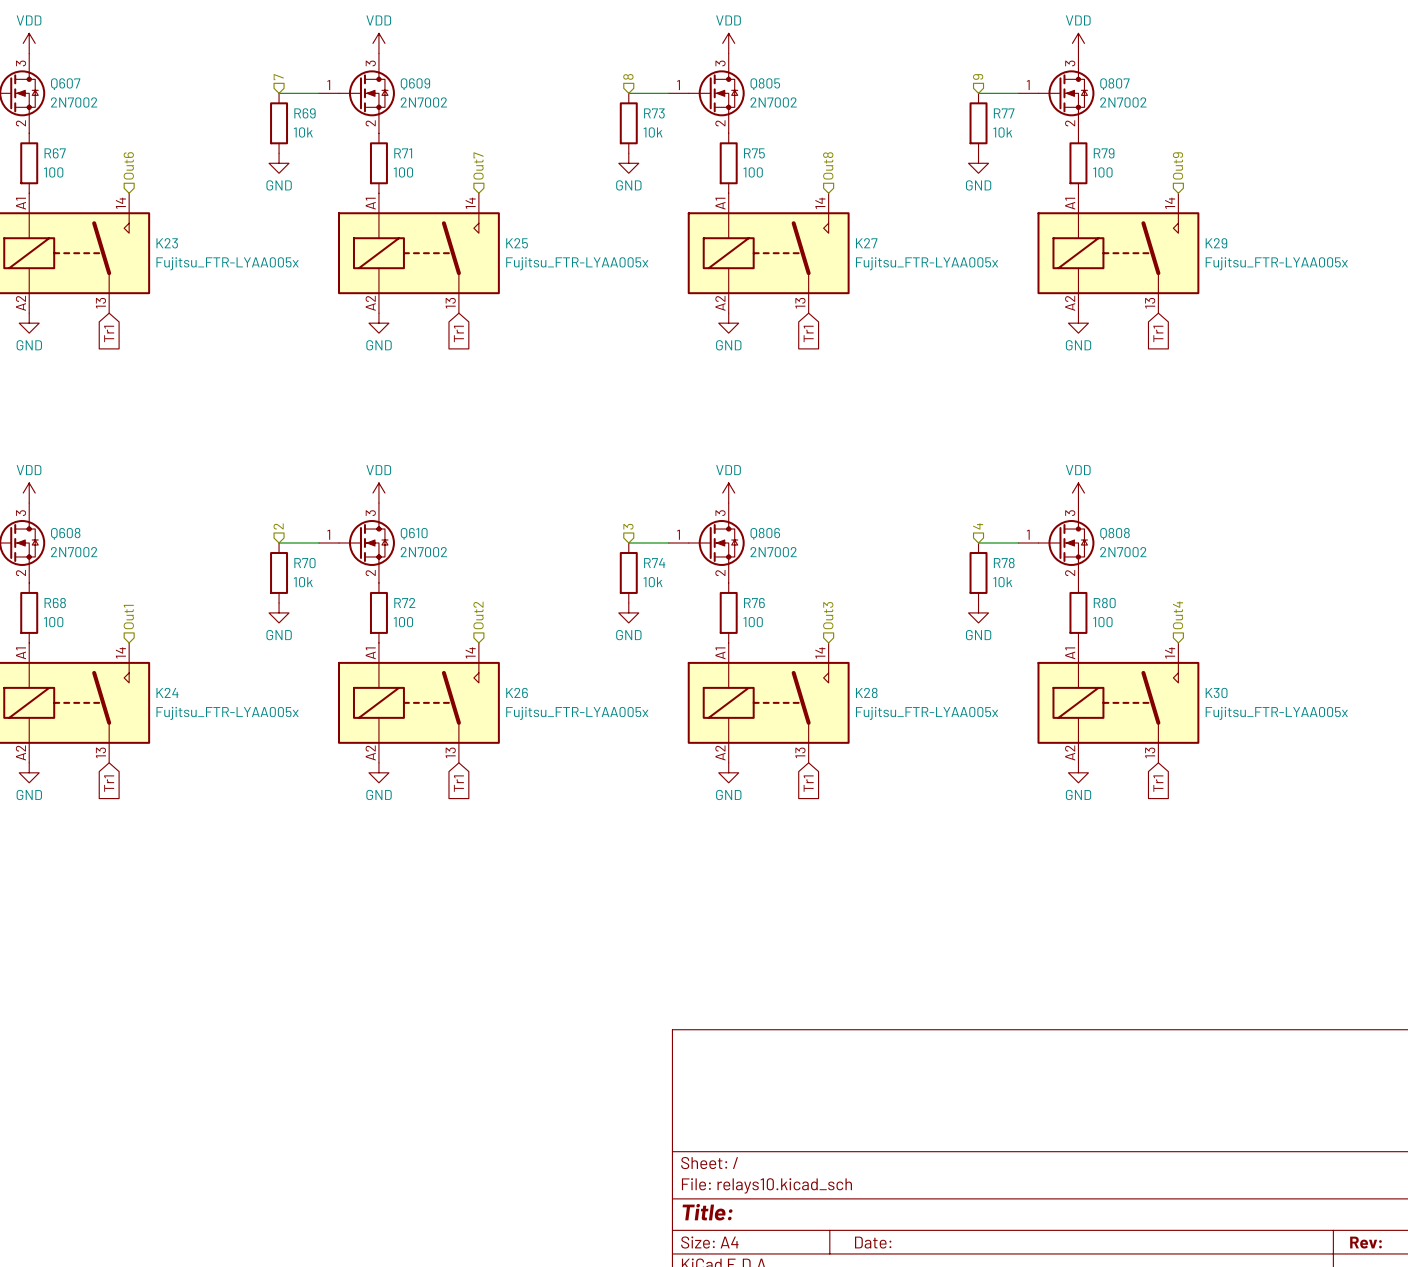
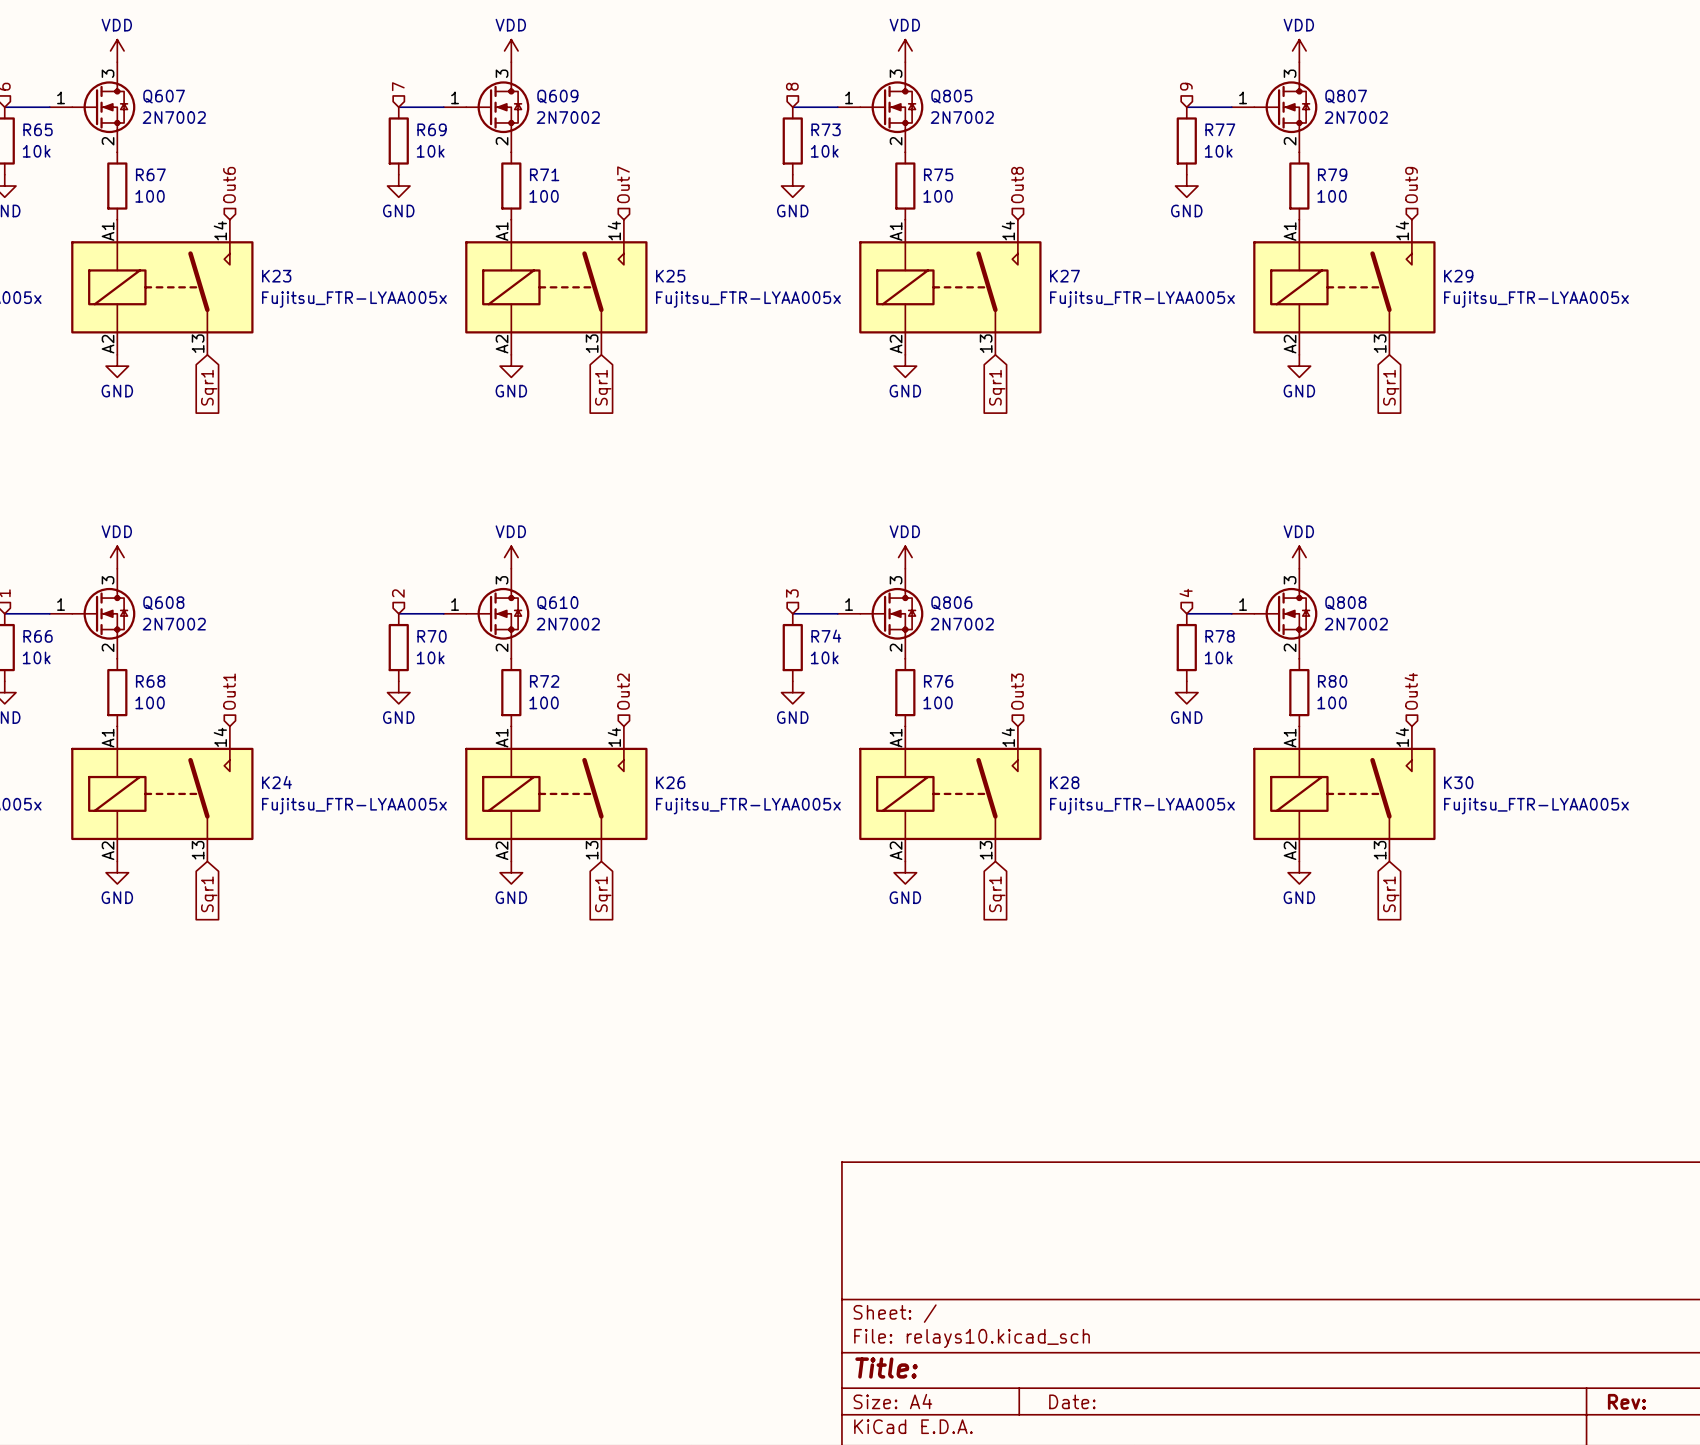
global label: Tr1 (109, 333) -> Sqr1 (209, 387)
global label: Tr1 (458, 333) -> Sqr1 (603, 387)
global label: Tr1 (808, 333) -> Sqr1 (997, 387)
global label: Tr1 (1158, 333) -> Sqr1 (1391, 387)
global label: Tr1 (109, 783) -> Sqr1 (209, 894)
global label: Tr1 (458, 783) -> Sqr1 (603, 894)
global label: Tr1 (808, 783) -> Sqr1 (997, 894)
global label: Tr1 (1158, 783) -> Sqr1 (1391, 894)

